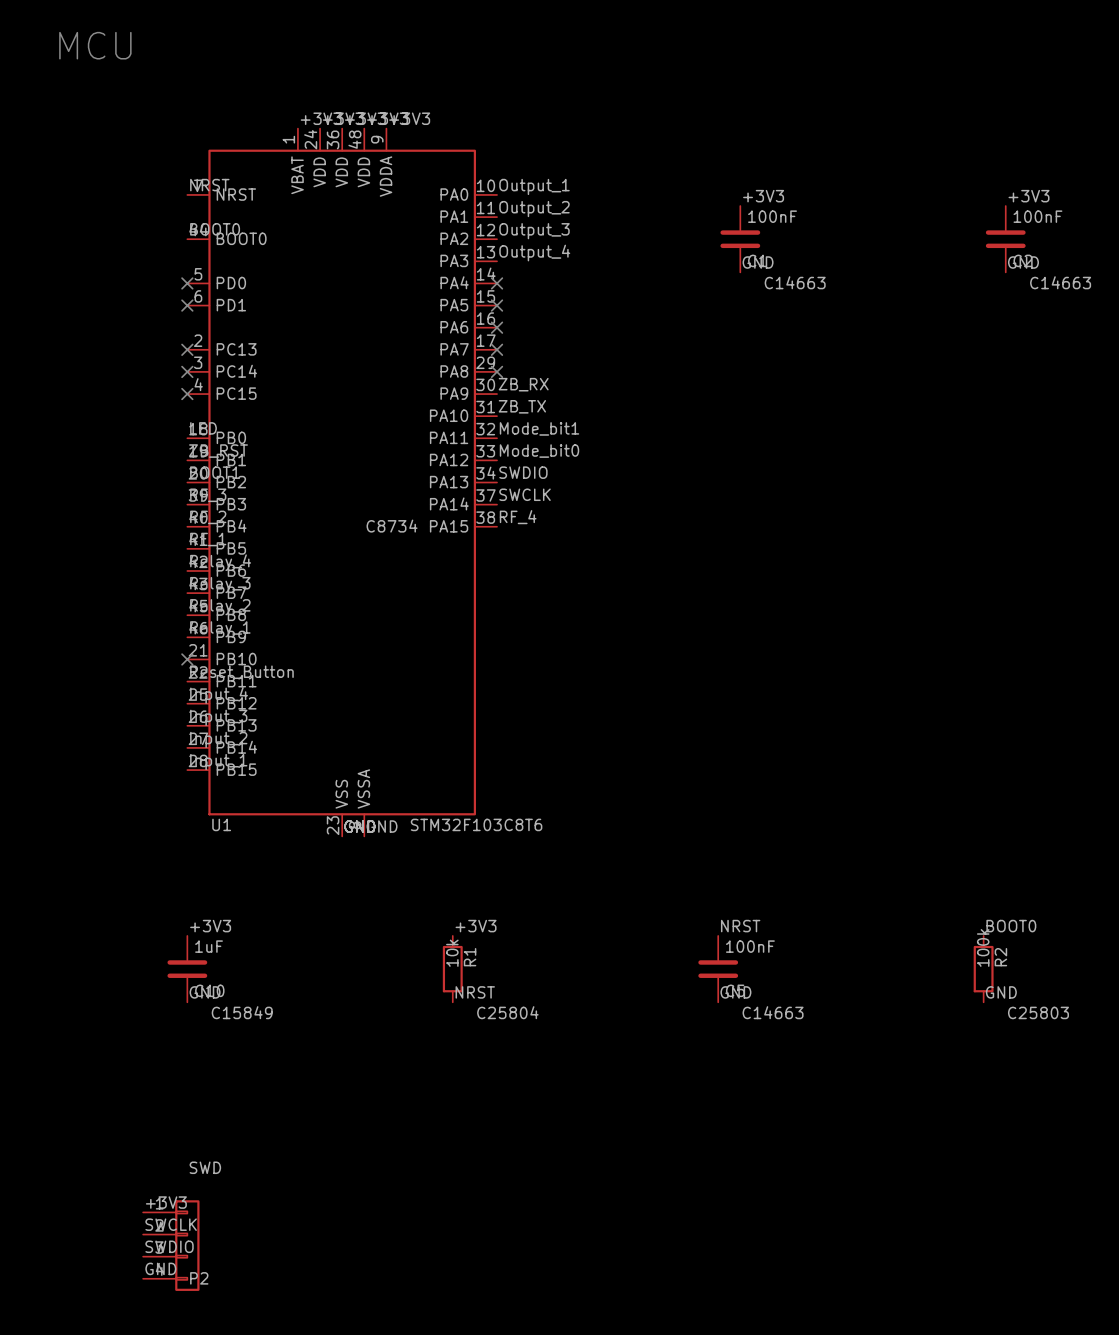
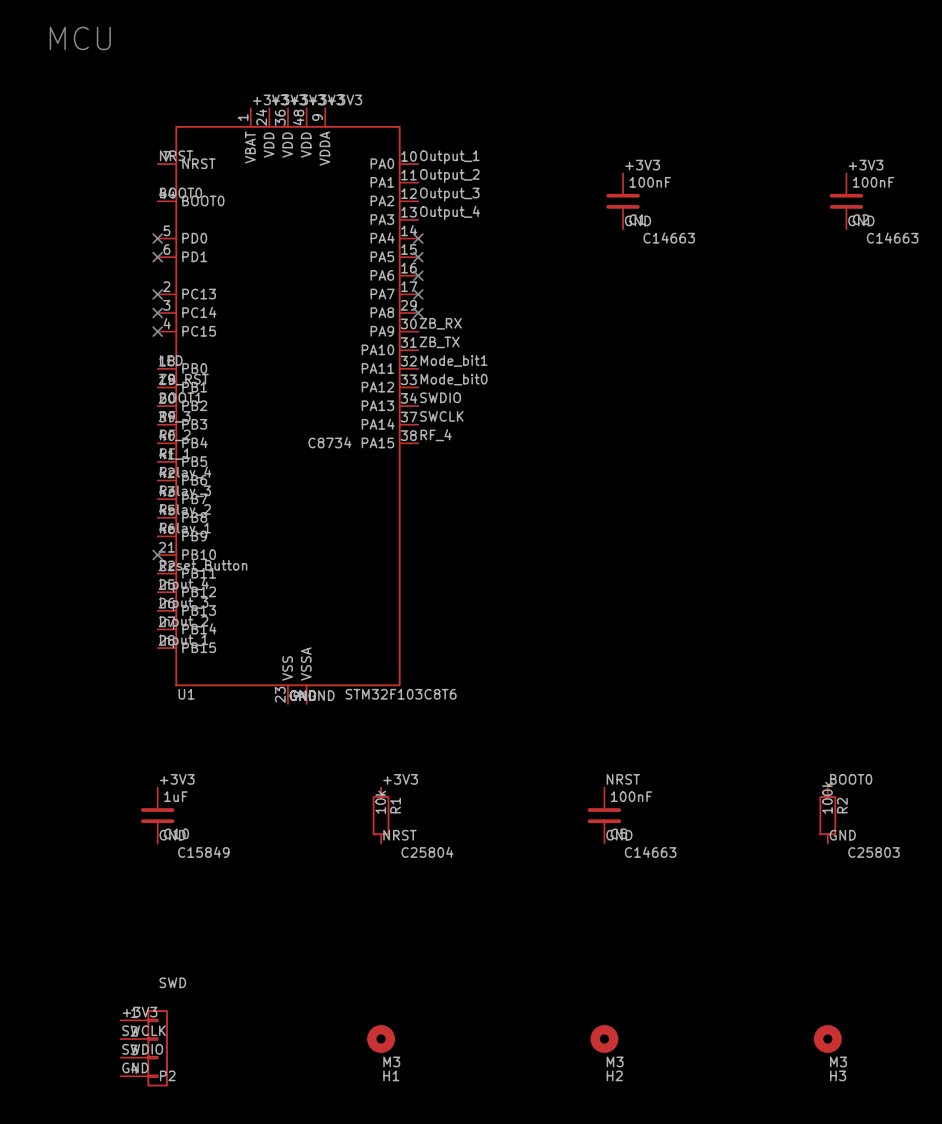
H1: none -> M3 (381, 1039)
H2: none -> M3 (604, 1039)
H3: none -> M3 (827, 1039)

